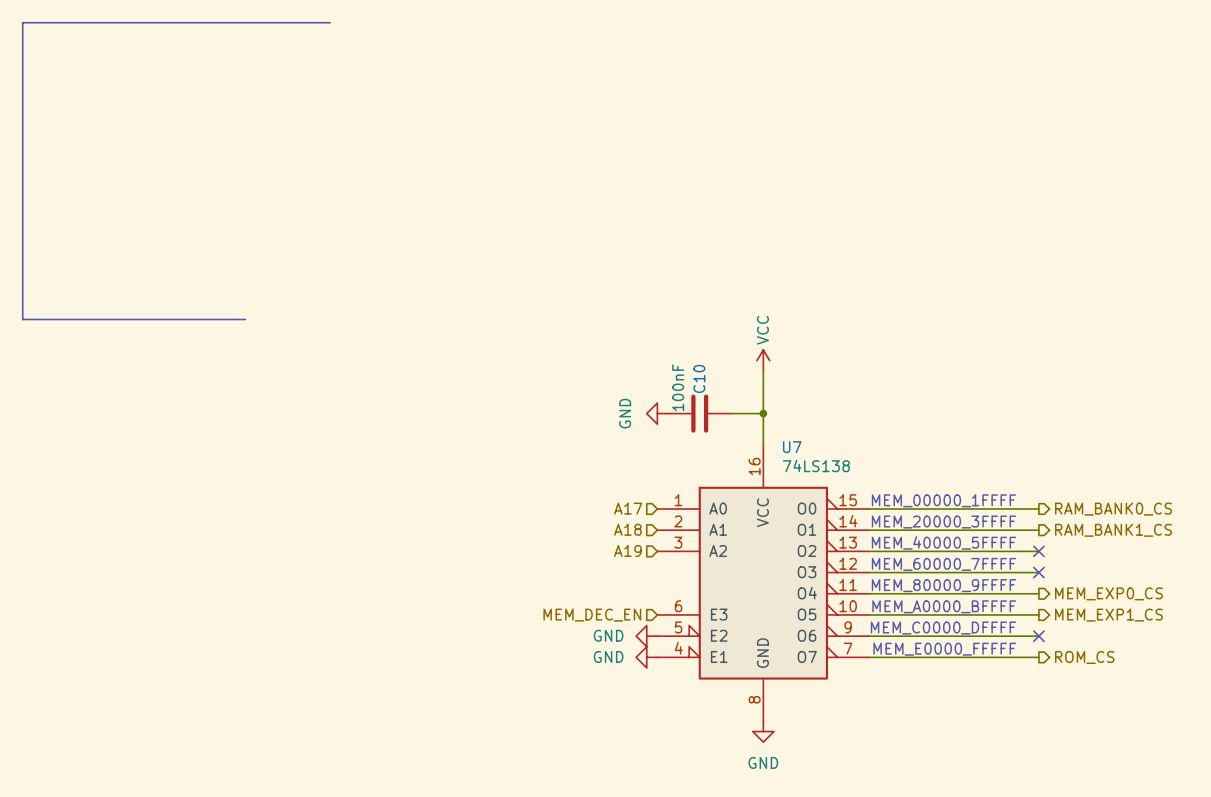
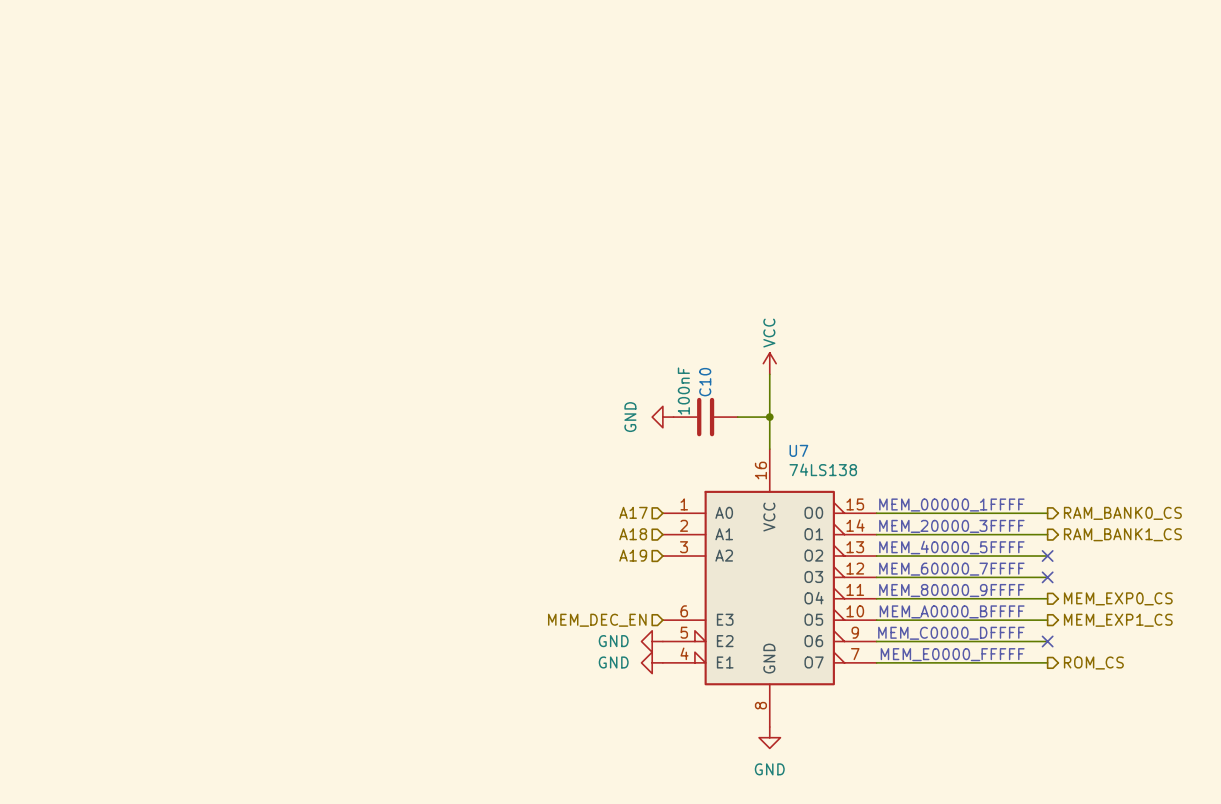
bus: (330, 22) (22, 22) (22, 319) (245, 319) -> none

